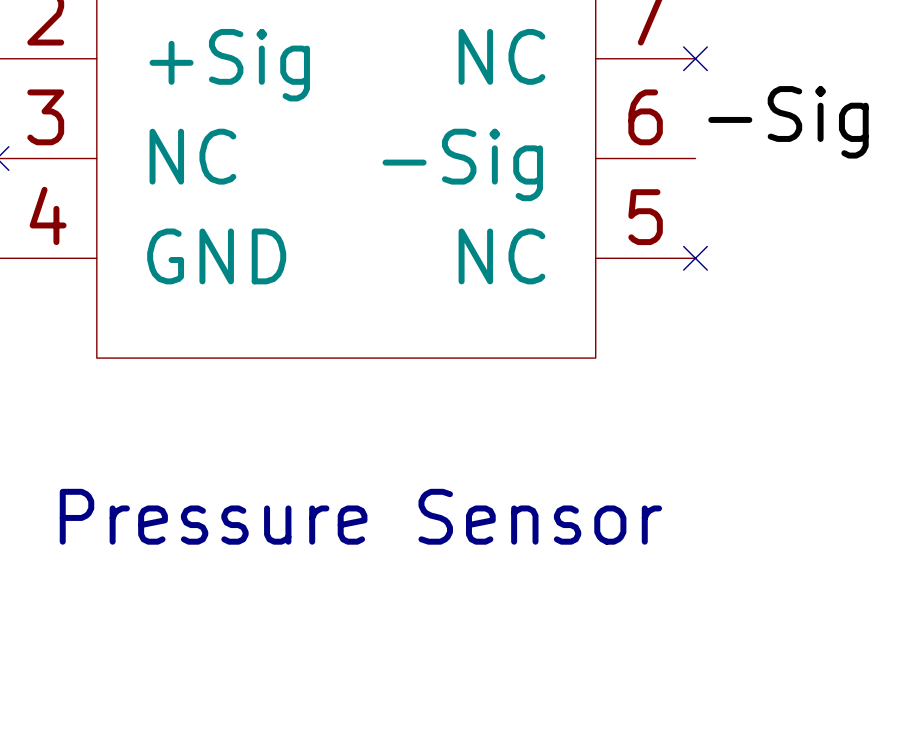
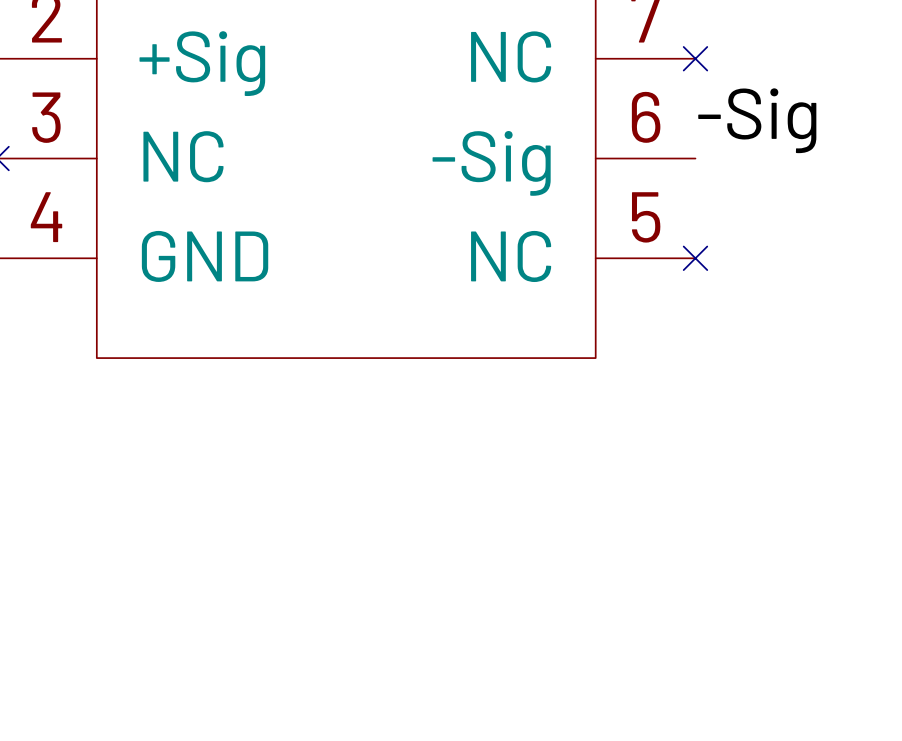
text: Pressure Sensor (360, 516) -> none

